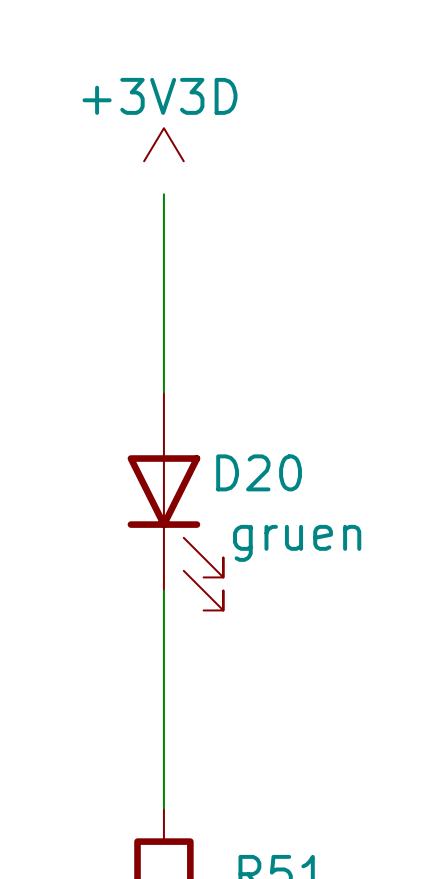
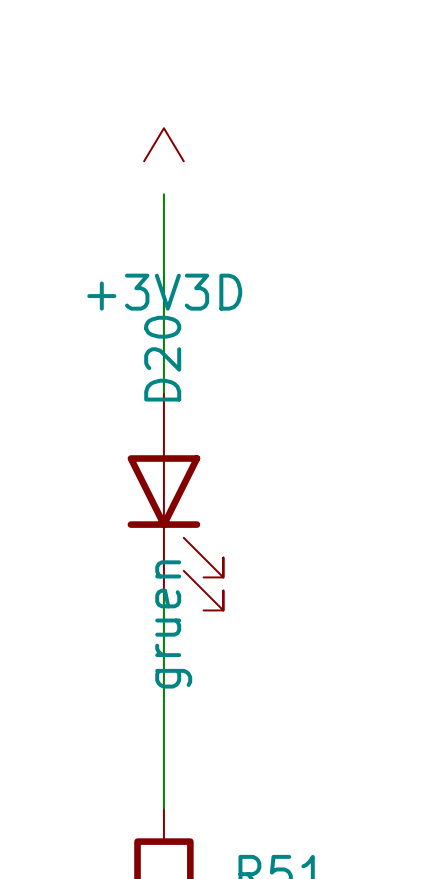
power symbol text position: +3V3D (159, 96) -> +3V3D (164, 292)
D20 name rotation: 0° (259, 472) -> 90° counterclockwise (162, 358)
D20 name position: D20 (259, 472) -> D20 (162, 358)
D20 value rotation: 0° (297, 543) -> 90° counterclockwise (173, 624)

